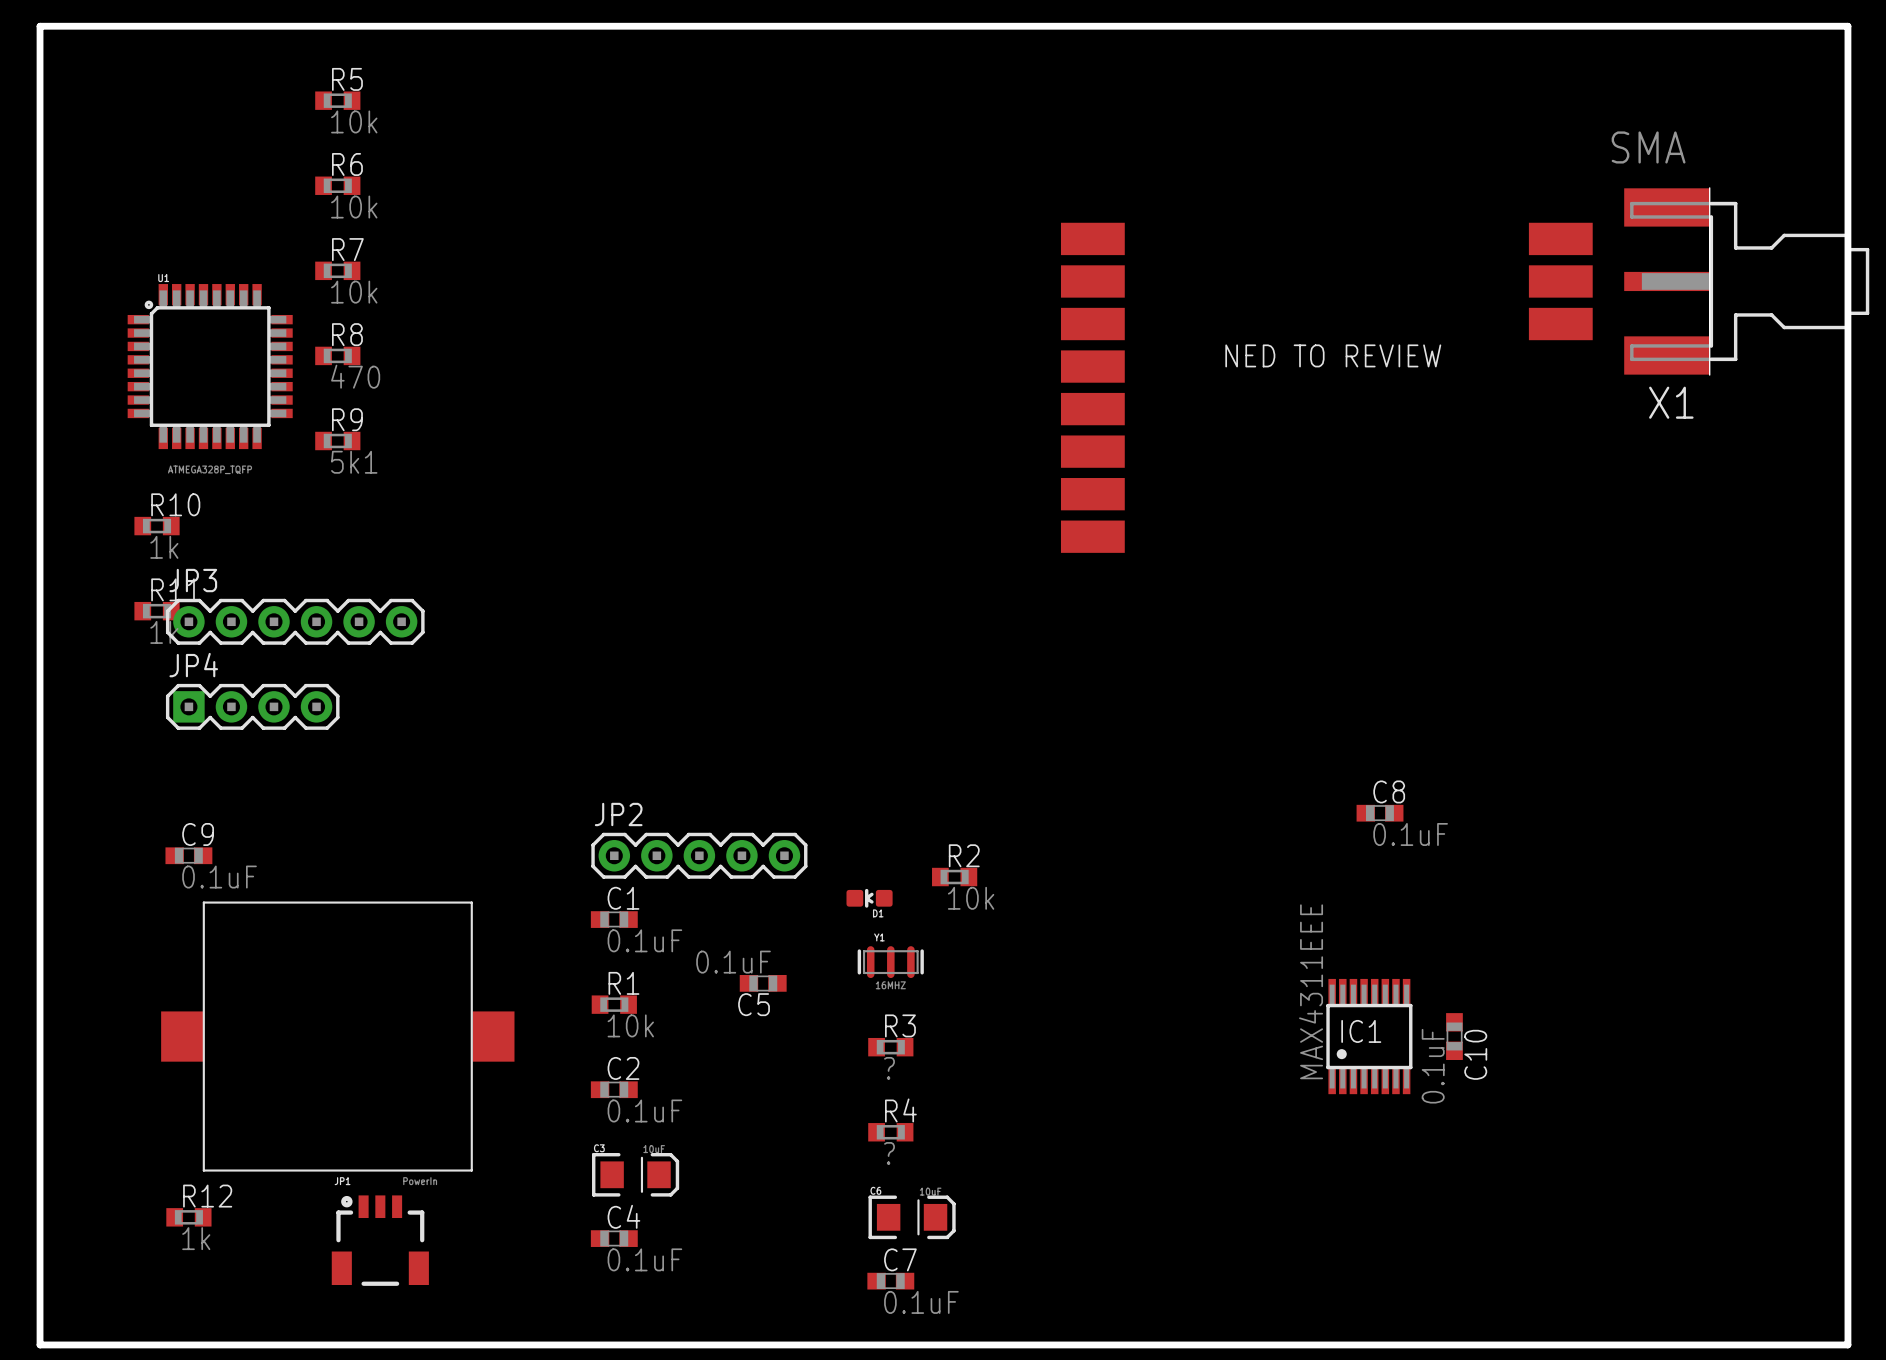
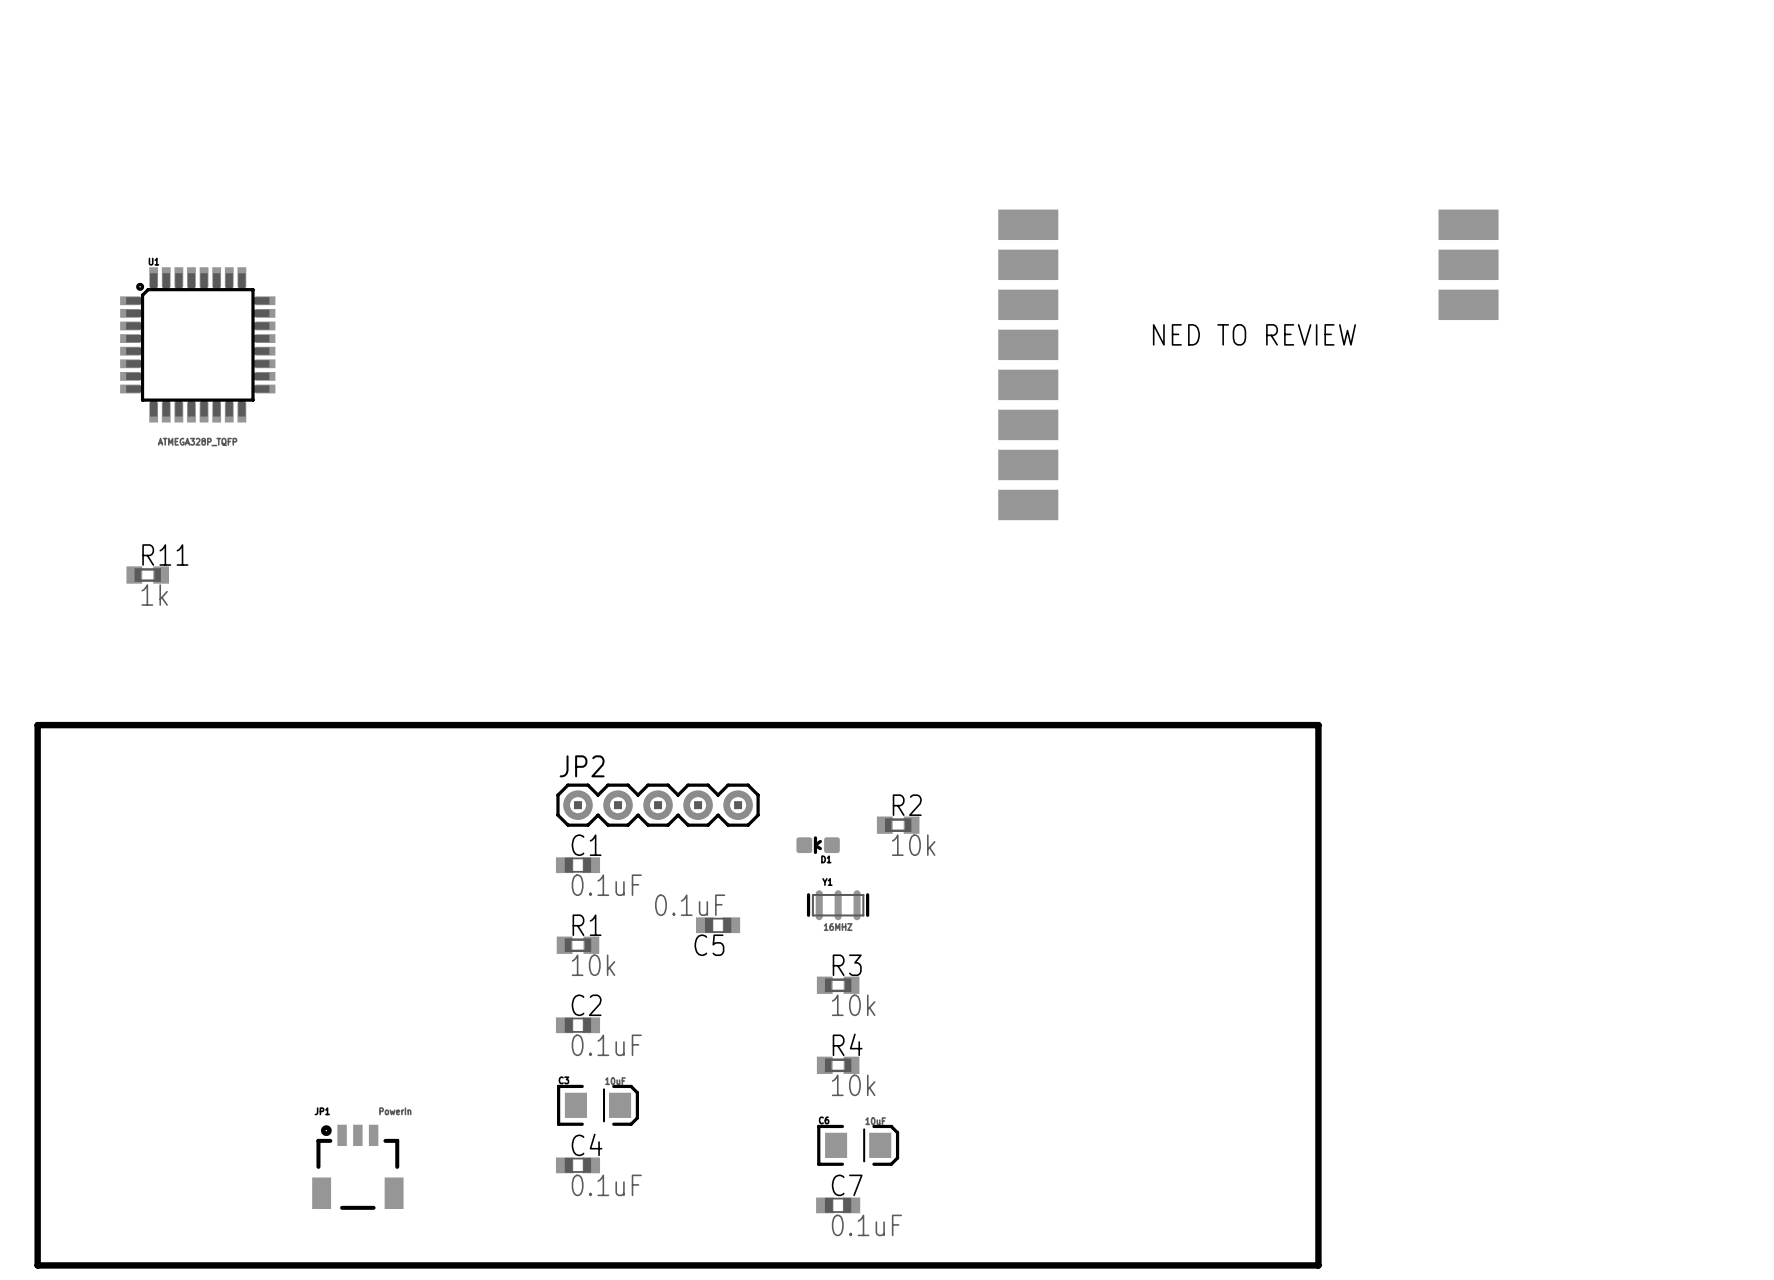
R5: 10k (337, 100) -> none
R6: 10k (337, 185) -> none
R7: 10k (337, 270) -> none
X1: SMA (1746, 281) -> none
R8: 470 (337, 355) -> none
R9: 5k1 (337, 440) -> none
R10: 1k (157, 526) -> none
JP3: (295, 621) -> none
JP4: (252, 706) -> none
board edge: (40, 770) (40, 26) (1847, 26) (1847, 1344) (1401, 1344) -> (37, 725) (1318, 725) (1318, 1265)
C8: 0.1uF (1380, 813) -> none
C9: 0.1uF (188, 855) -> none
part: (337, 1036) -> none
IC1: MAX4311EEE (1369, 1036) -> none
C10: 0.1uF (1454, 1036) -> none
R3 value: ? (889, 1068) -> 10k (853, 1005)
R4 value: ? (889, 1153) -> 10k (853, 1085)
R12: 1k (188, 1217) -> none

